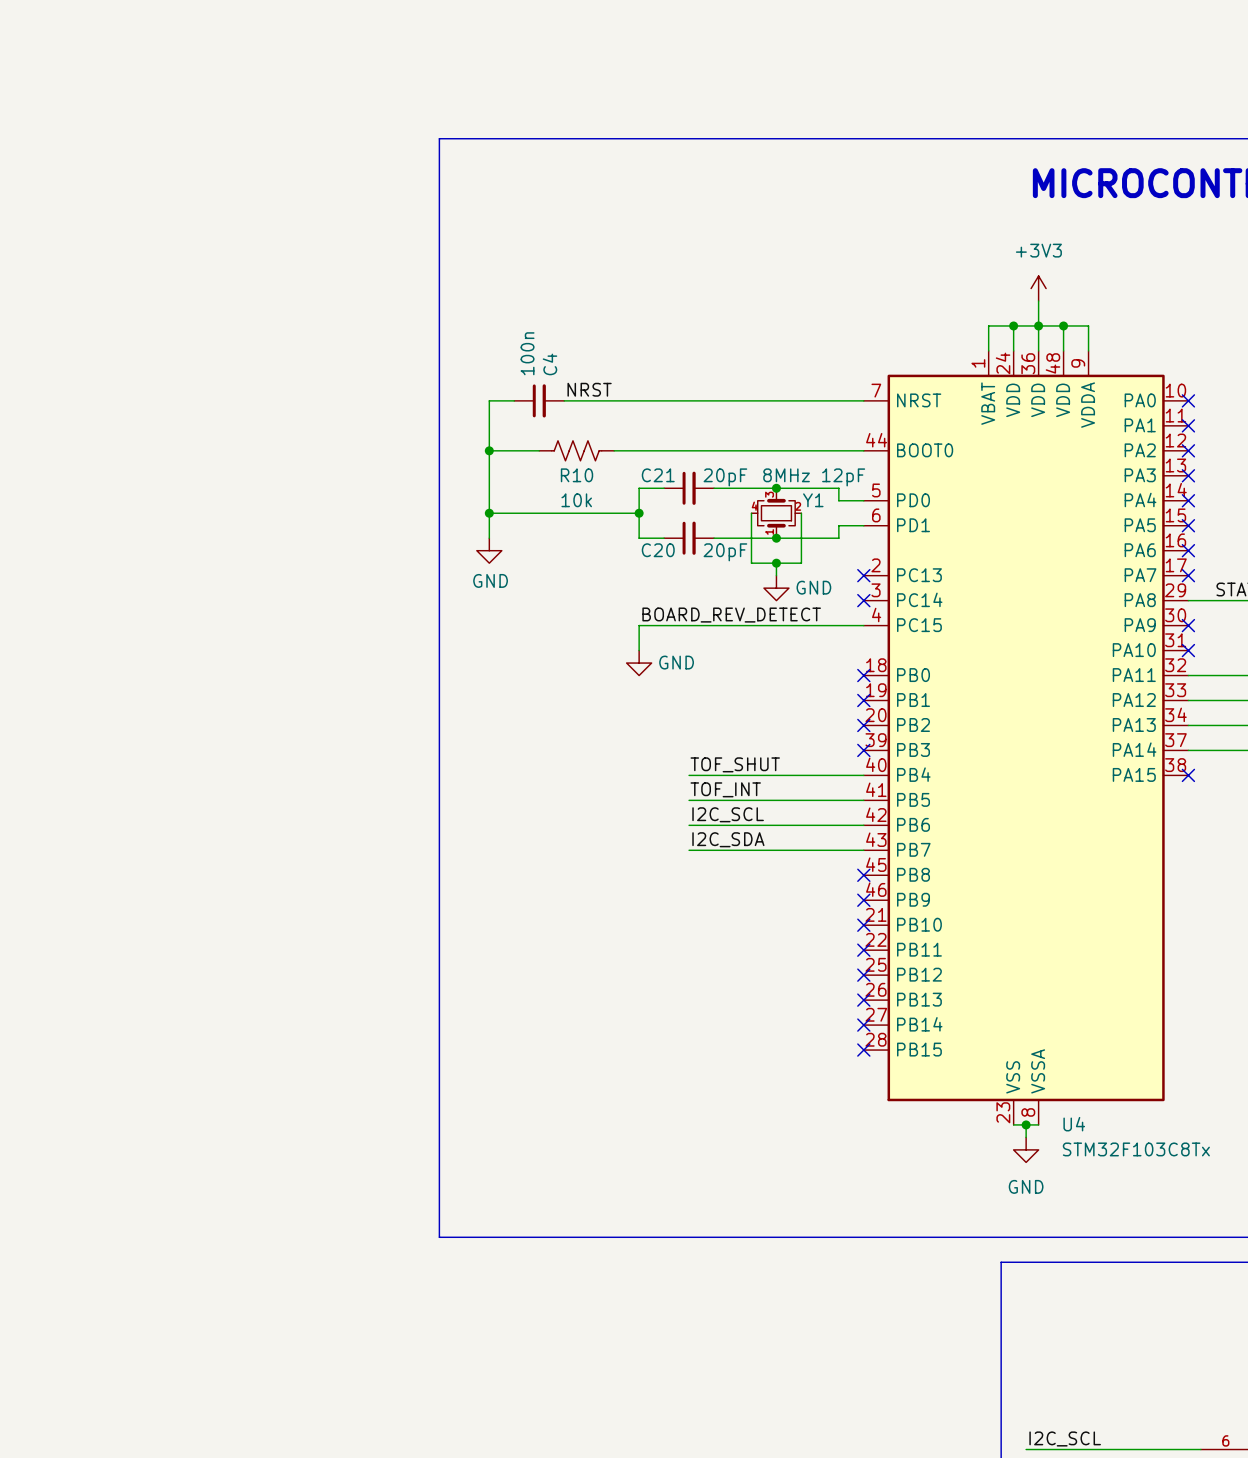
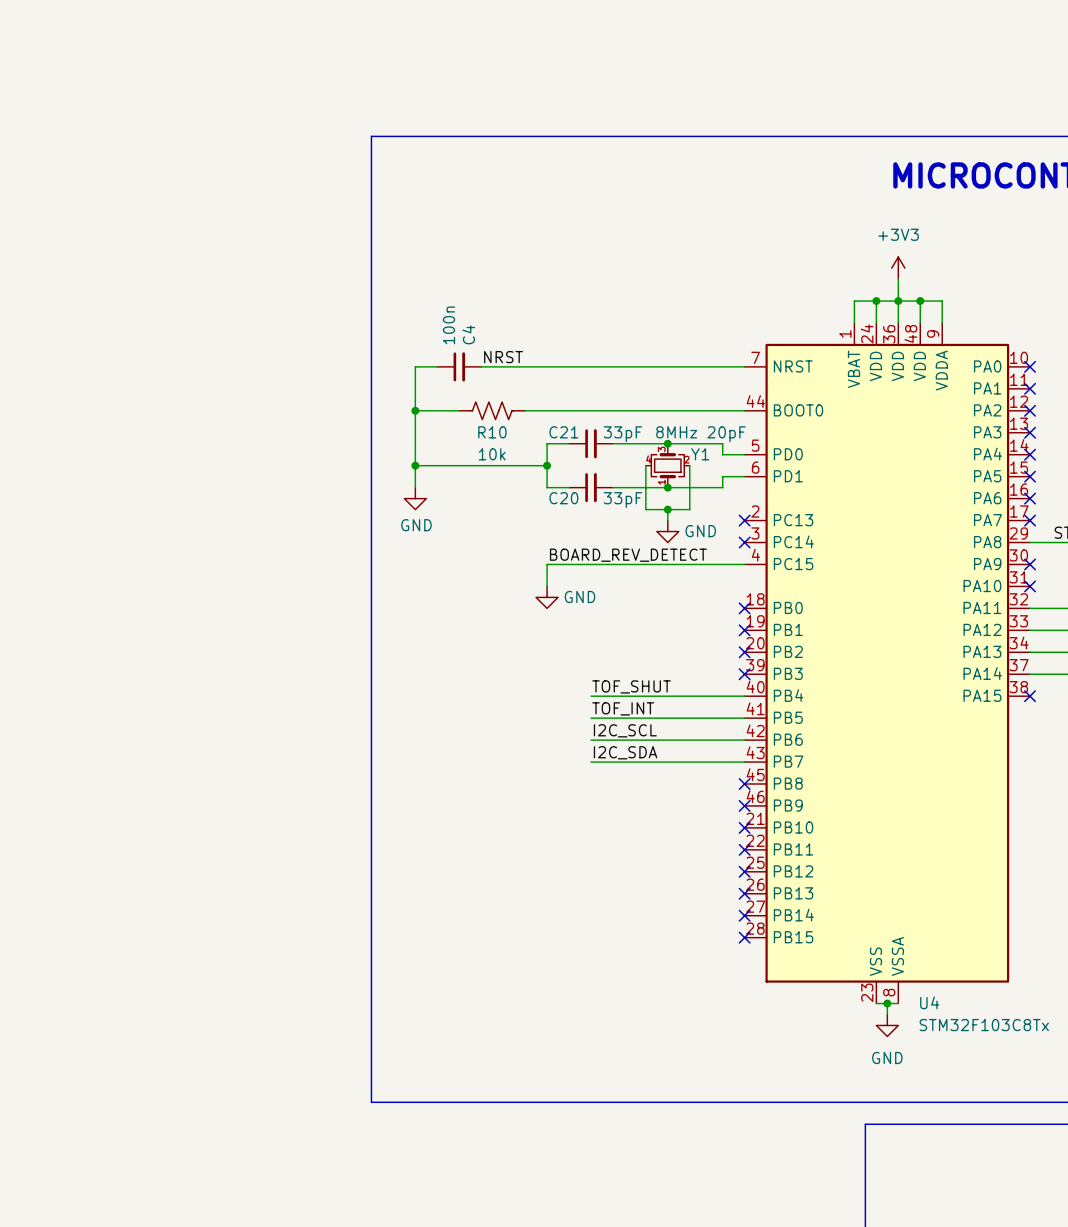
C21 value: 20pF (725, 477) -> 33pF (622, 434)
Y1 value: 8MHz 12pF (814, 477) -> 8MHz 20pF (701, 434)
C20 value: 20pF (725, 552) -> 33pF (622, 500)

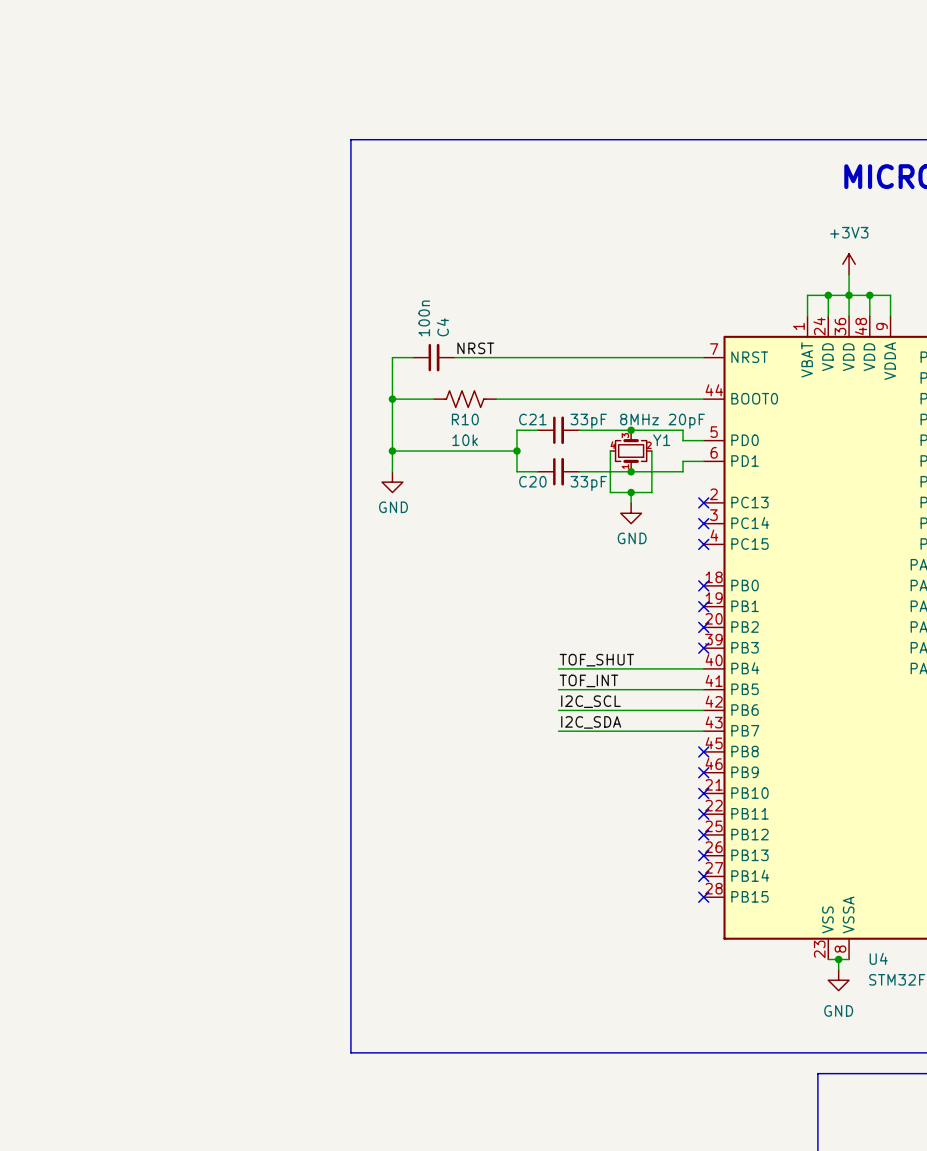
power symbol text position: GND (700, 531) -> GND (632, 538)
label: BOARD_REV_DETECT (628, 555) -> none
wire: (744, 564) (547, 564) (547, 586) -> none
no-connect mark: none -> (703, 544)
power symbol: GND (547, 597) -> none

